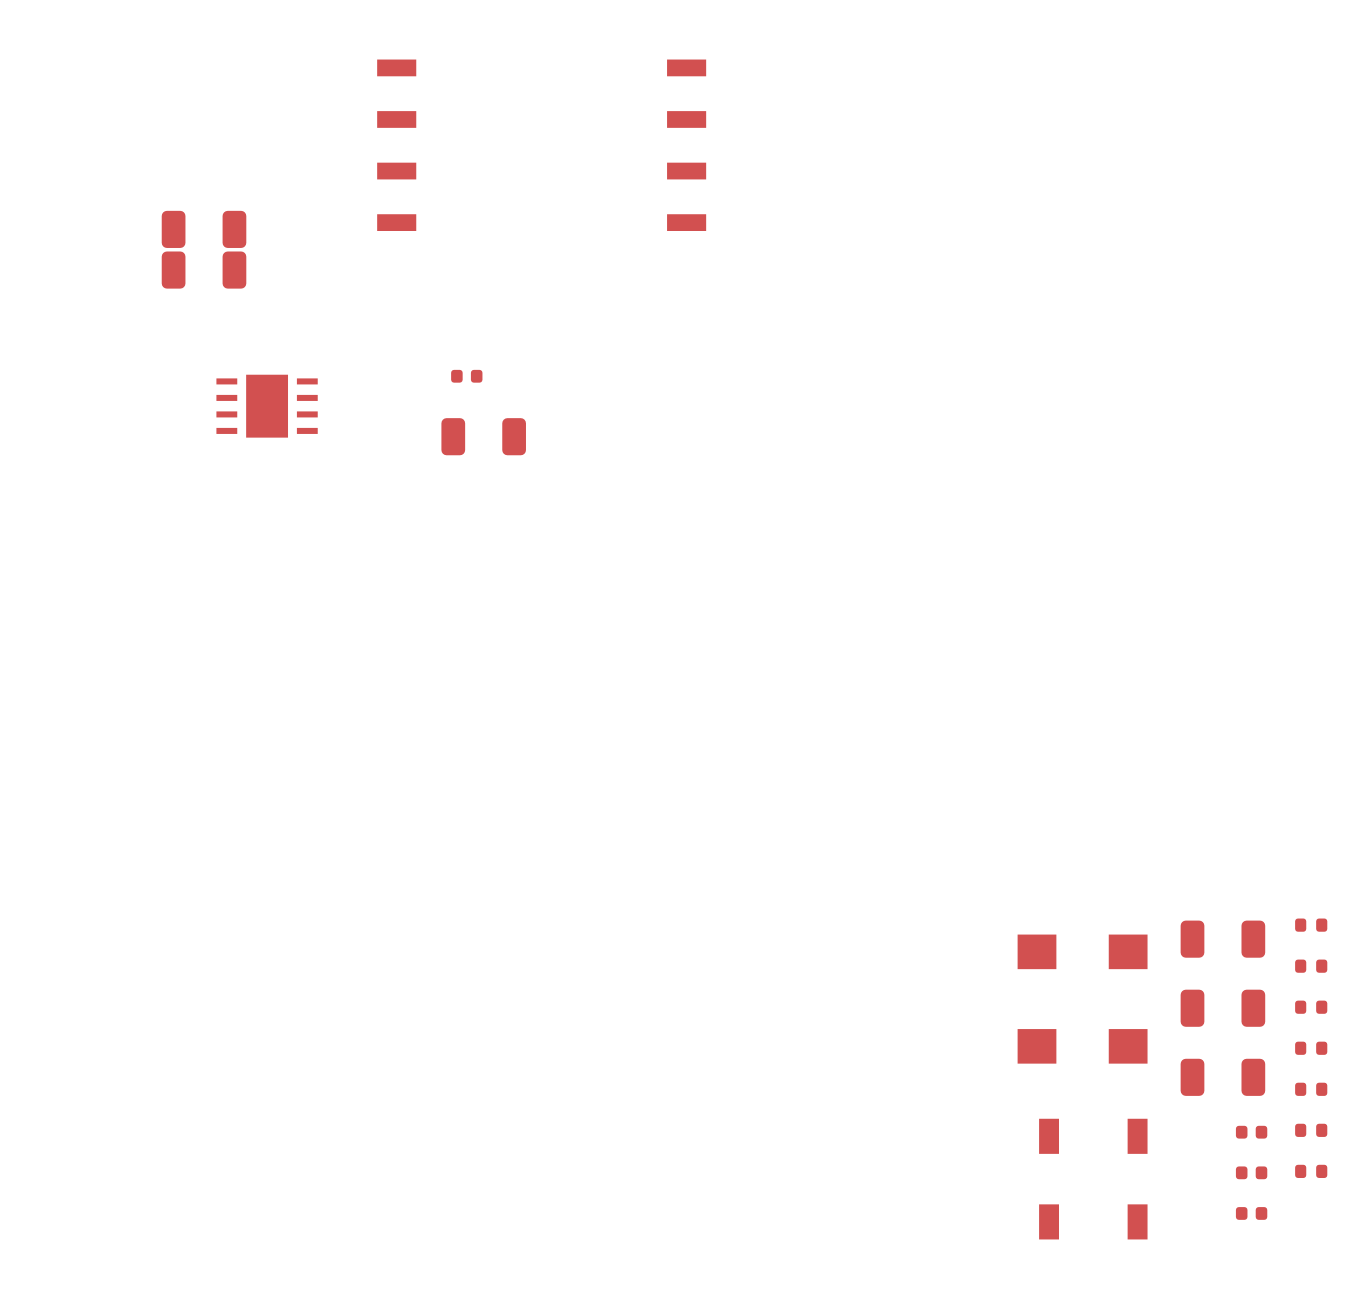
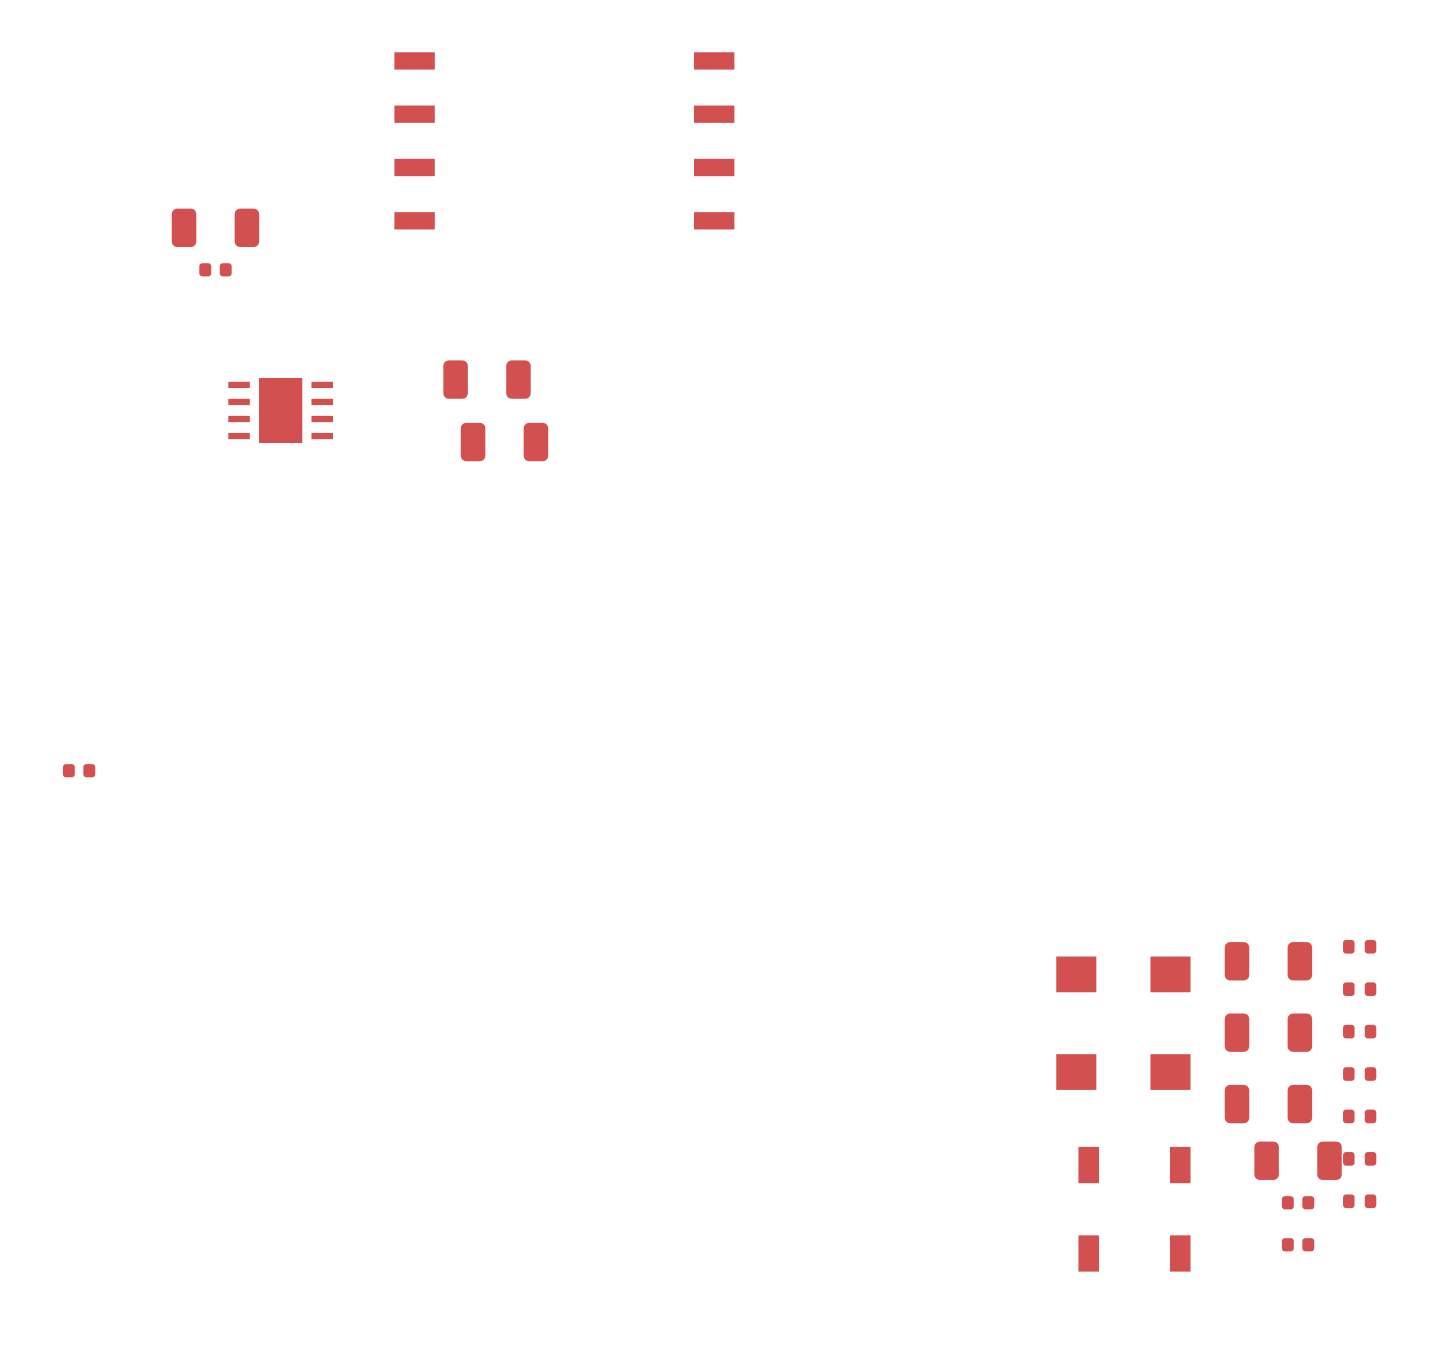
part footprint: [161, 251, 247, 289] -> [199, 263, 232, 277]
part footprint: [451, 369, 483, 383] -> [443, 360, 531, 399]
part: none -> (79, 770)
part footprint: [1235, 1125, 1268, 1139] -> [1254, 1141, 1342, 1180]

